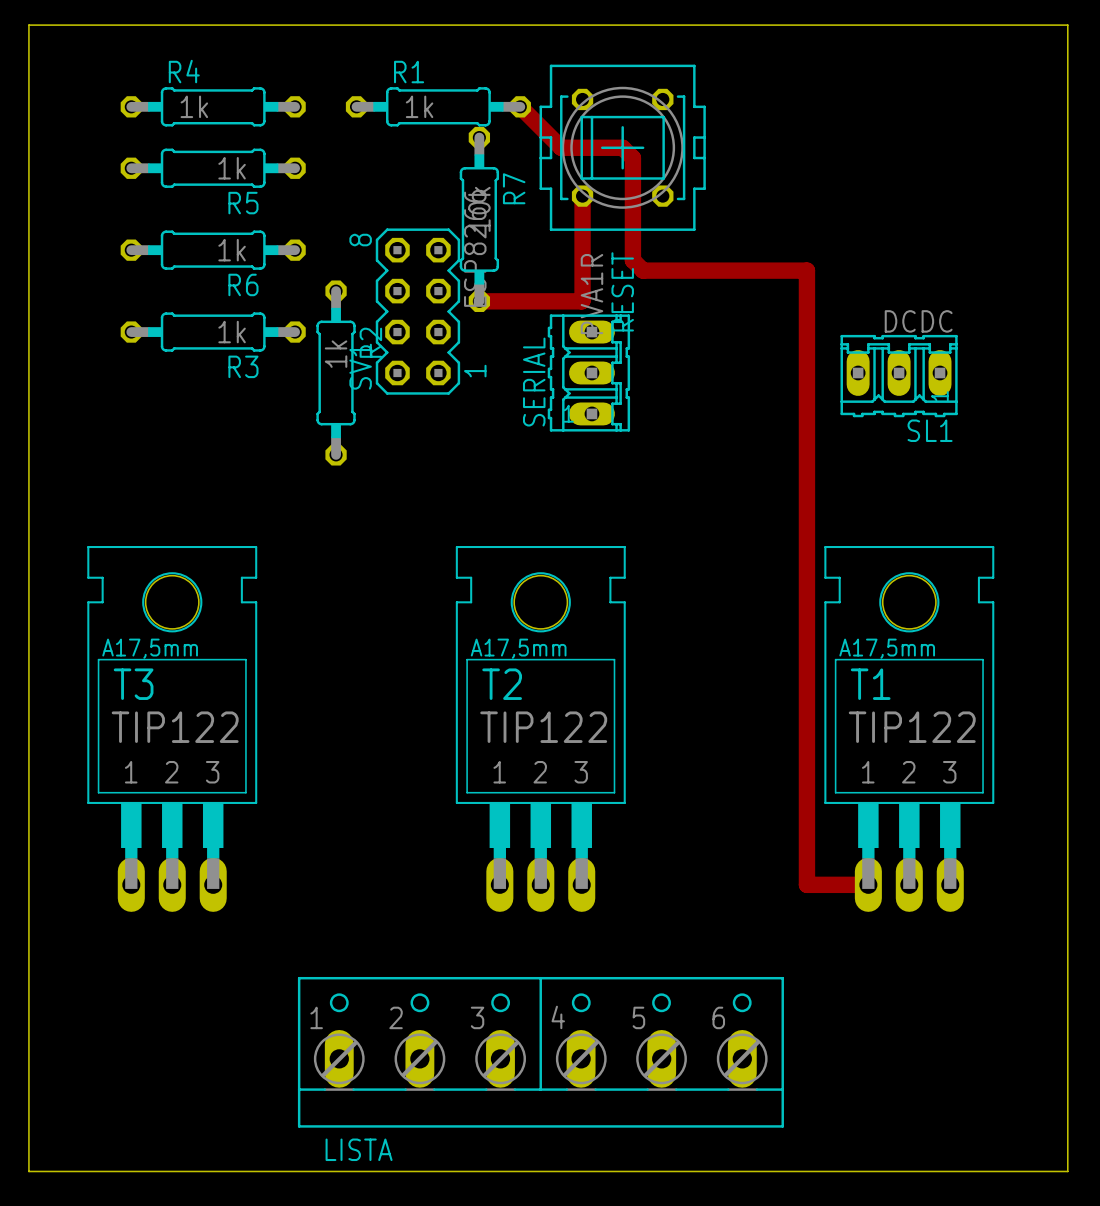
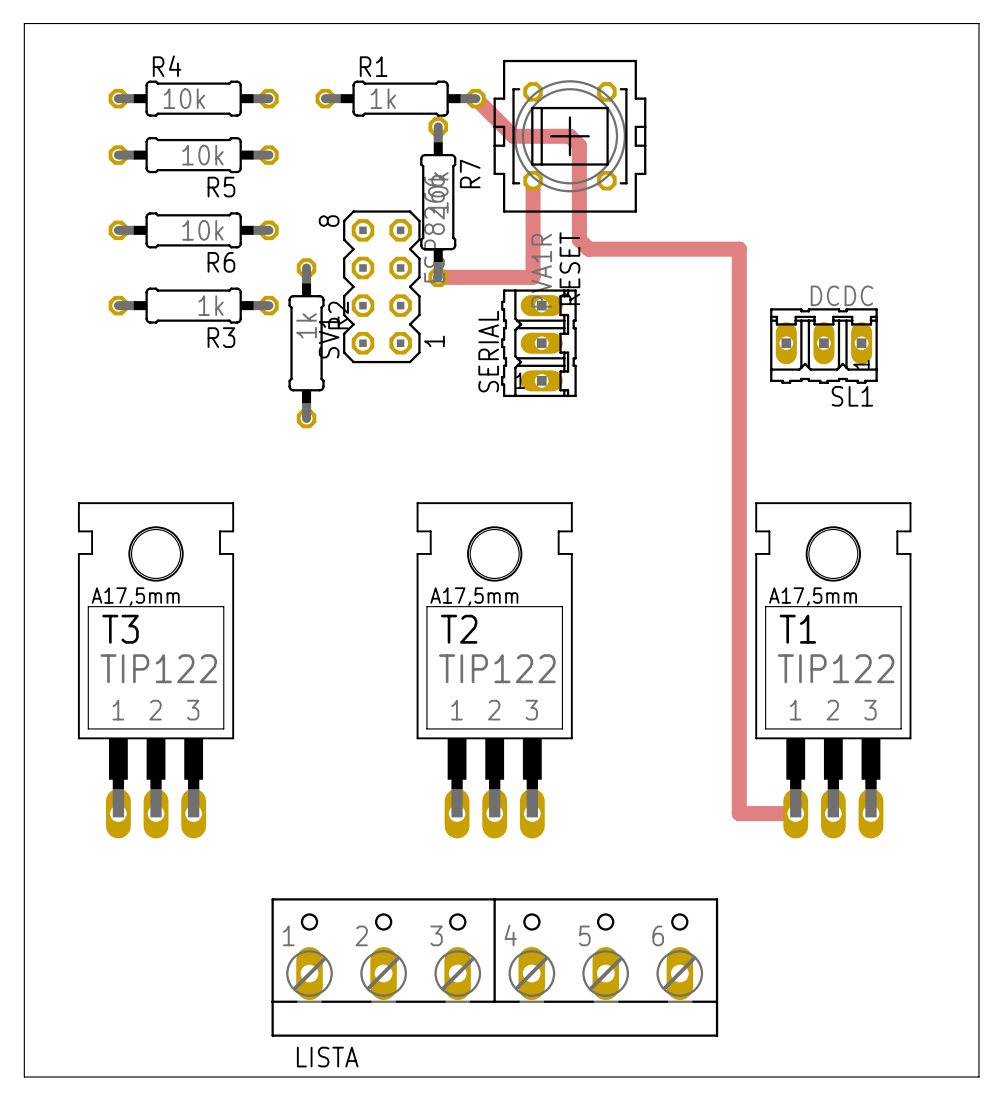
R4 value: 1k (194, 106) -> 10k (184, 98)
R5 value: 1k (232, 168) -> 10k (202, 155)
R6 value: 1k (232, 250) -> 10k (202, 230)

